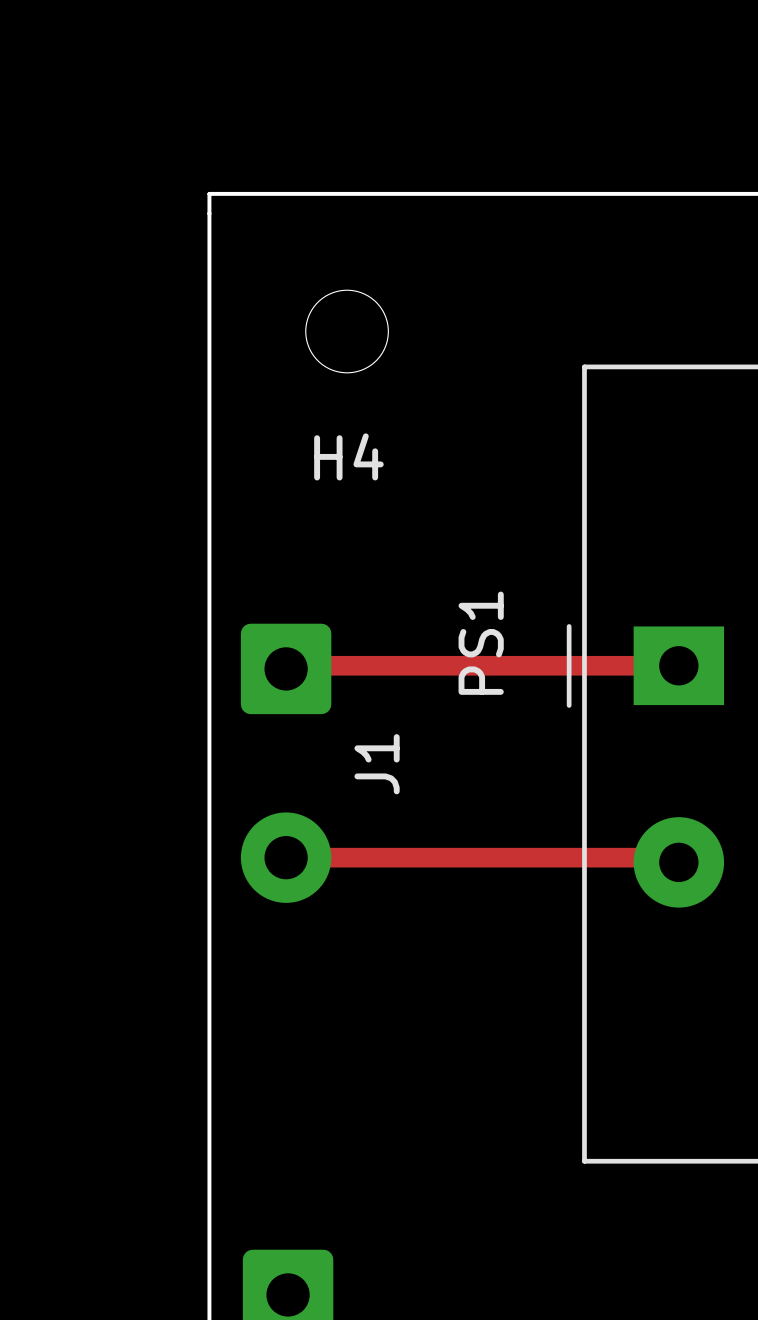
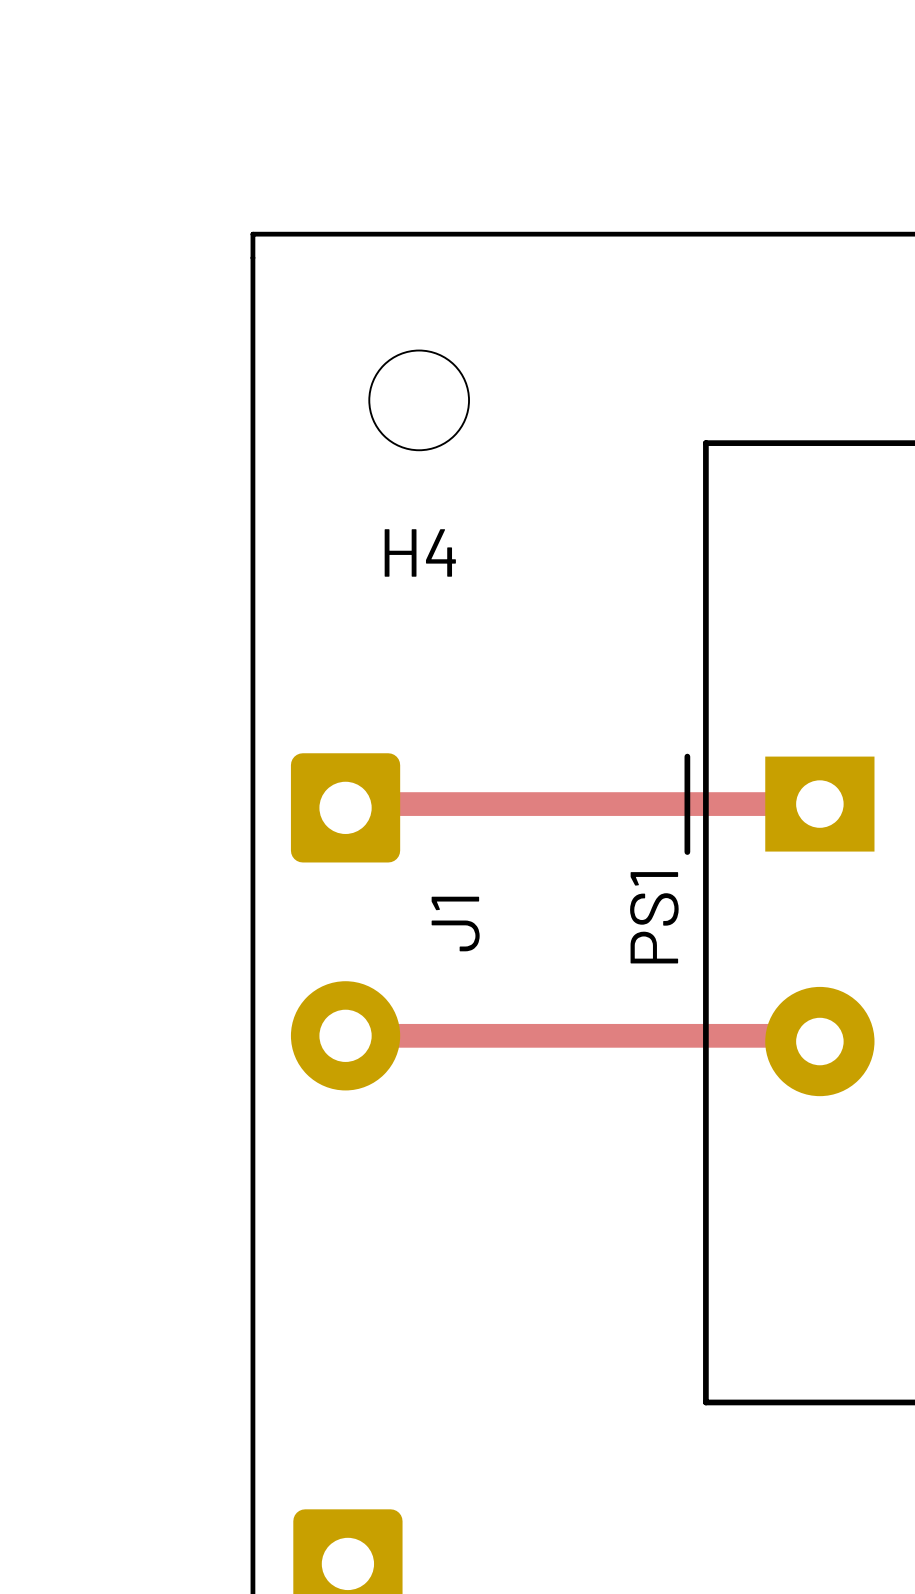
PS1 name position: PS1 (481, 643) -> PS1 (654, 917)

